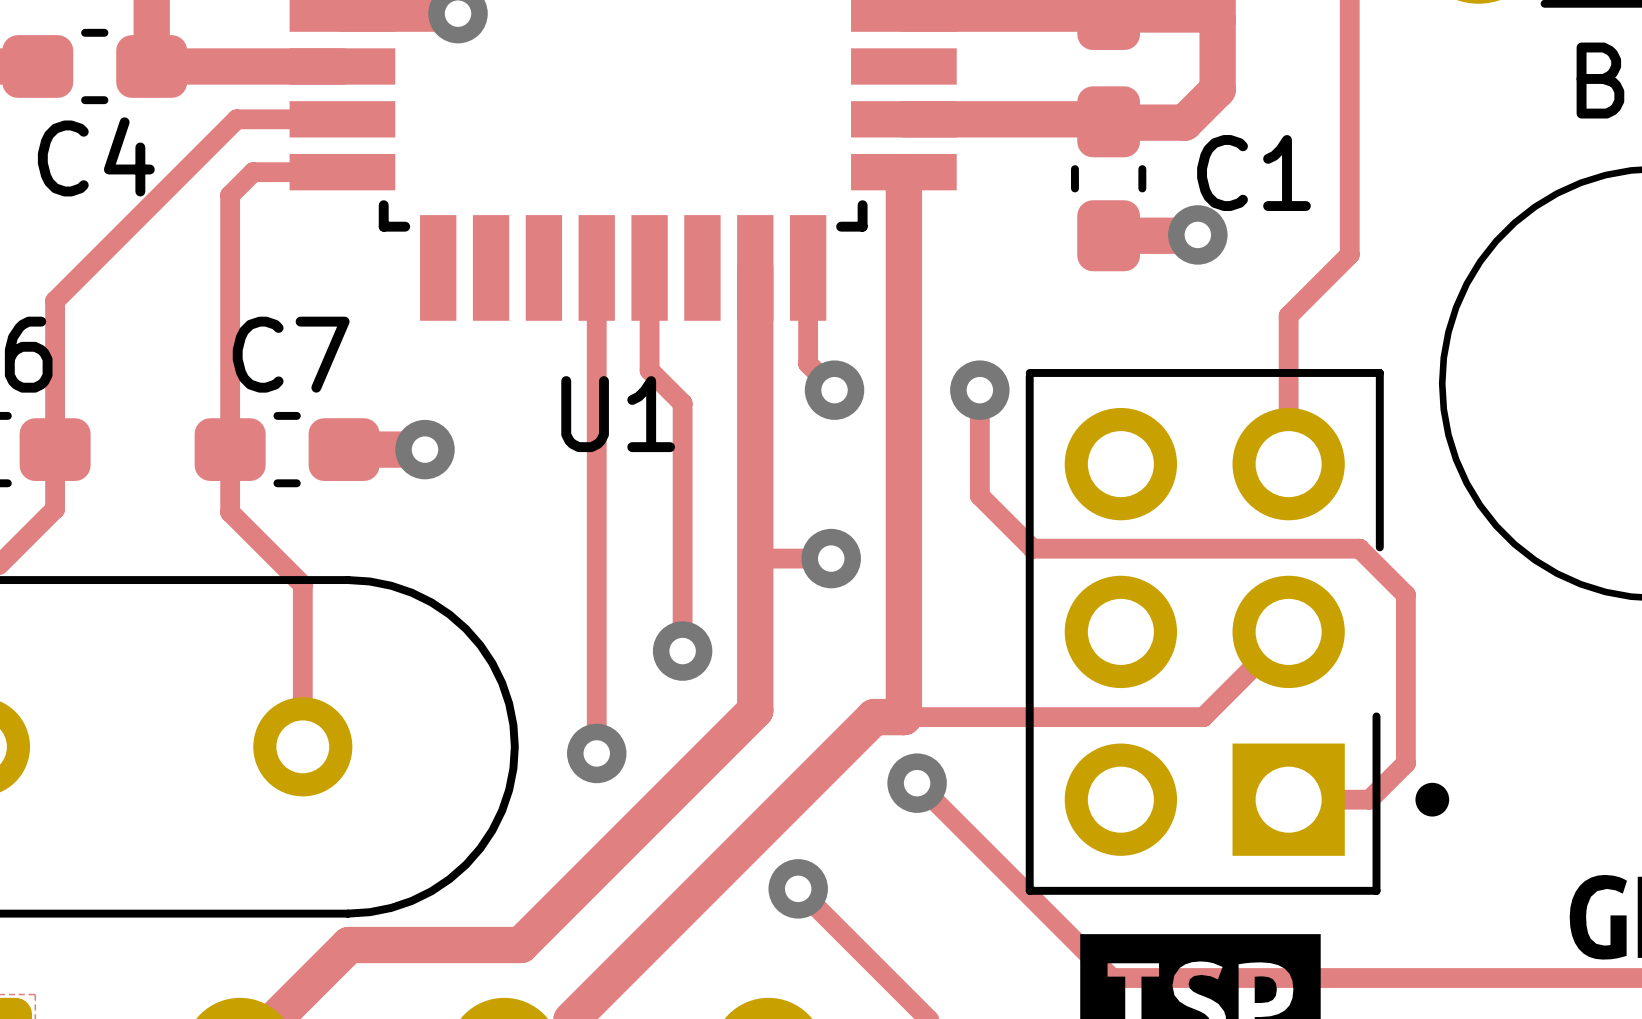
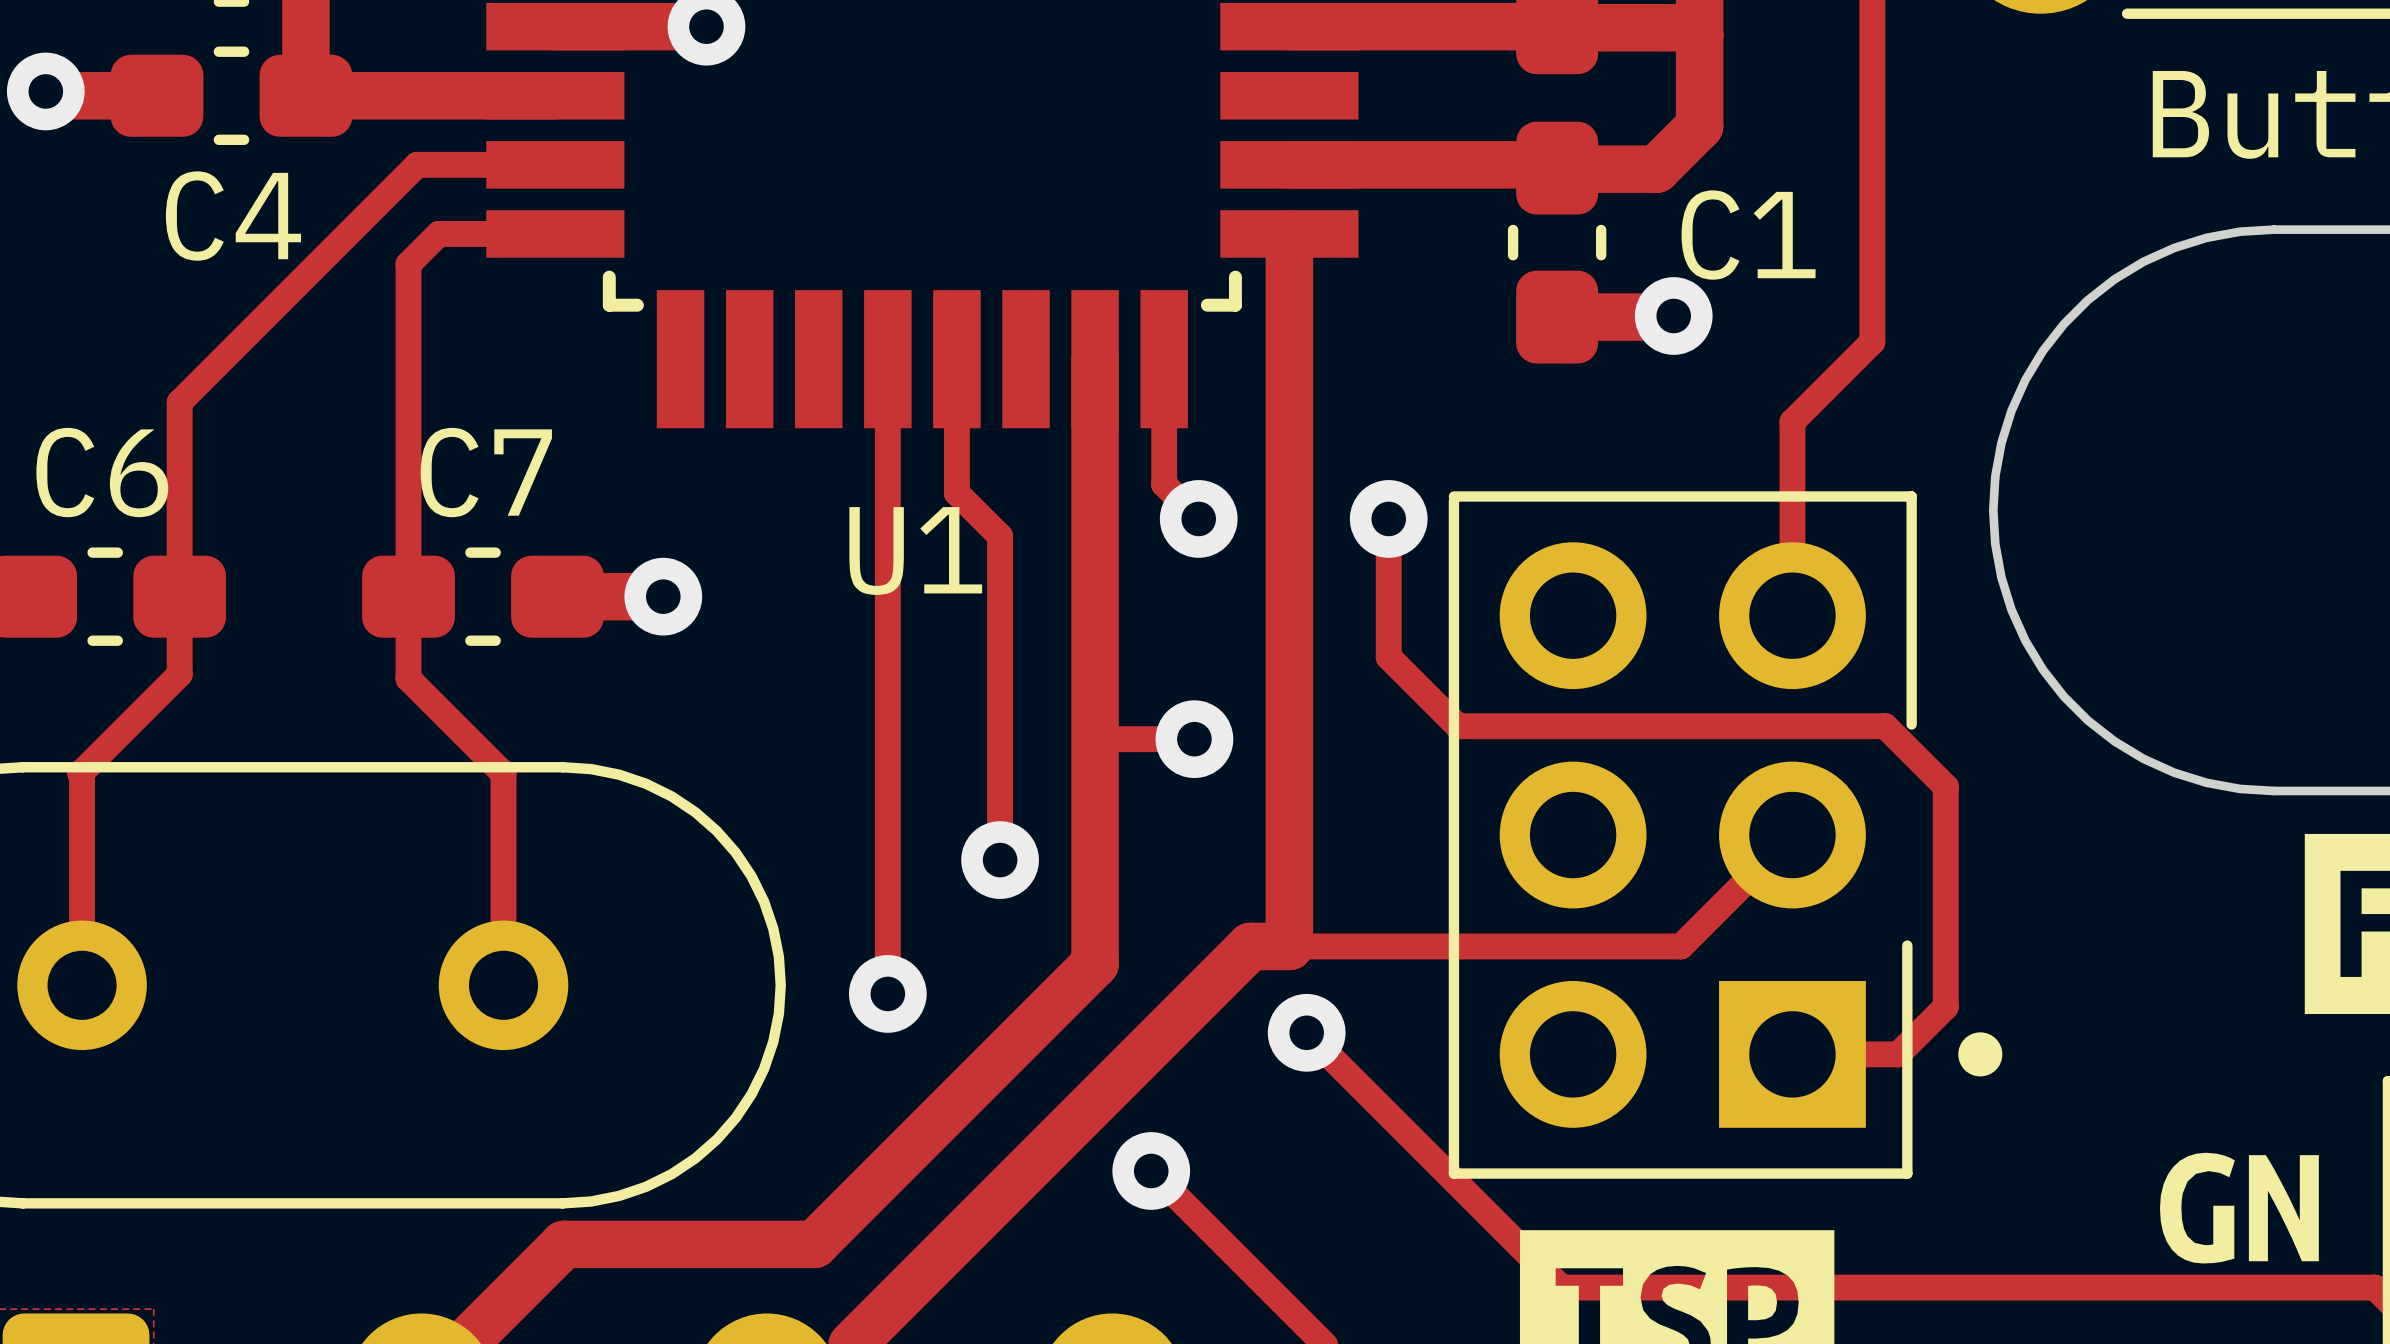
track: (755, 710) (520, 945) -> (1095, 937) (1095, 963) (814, 1244) (788, 1244)

